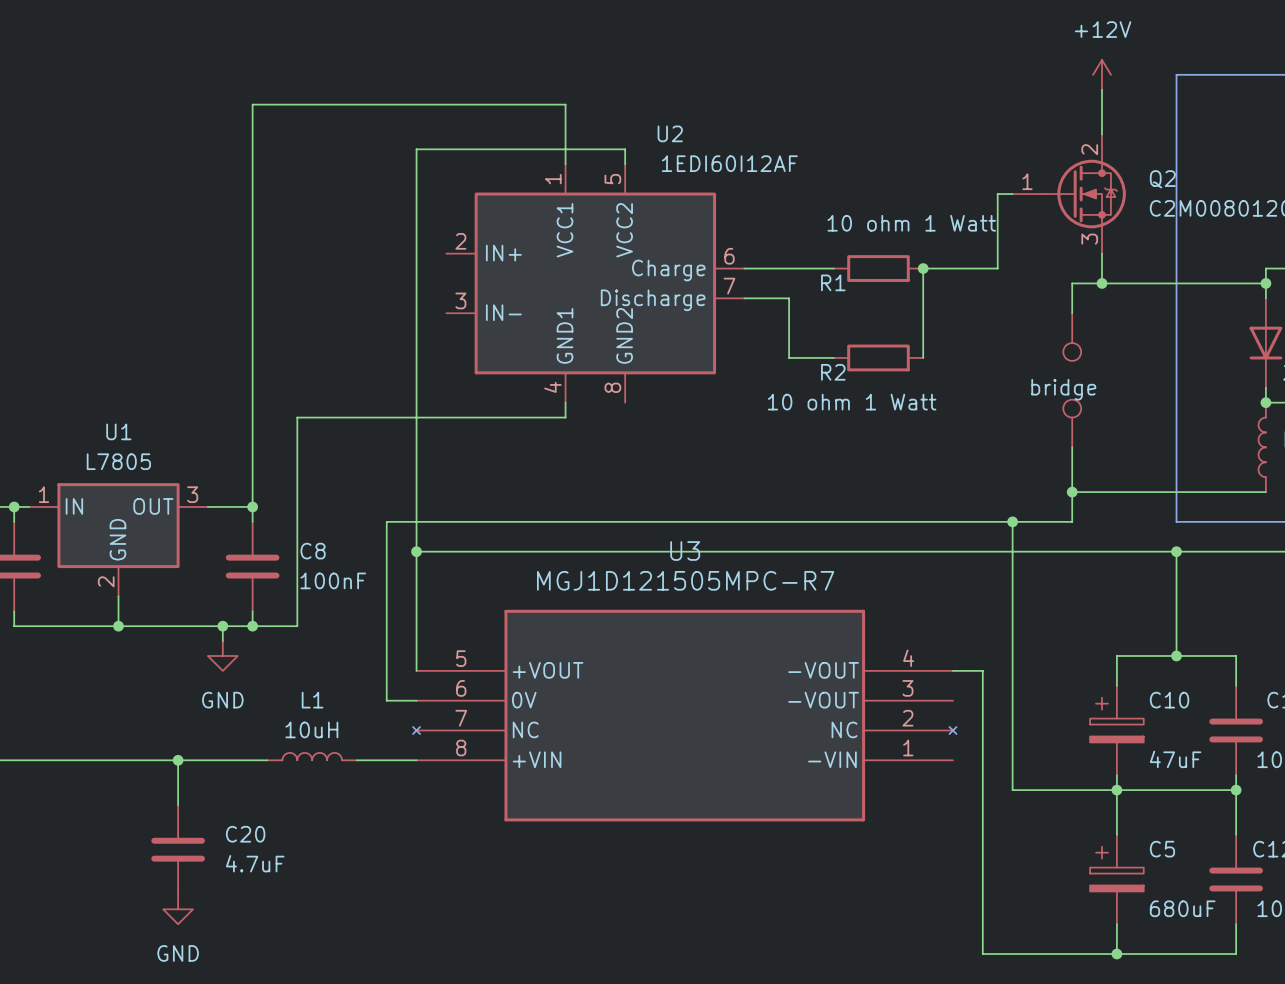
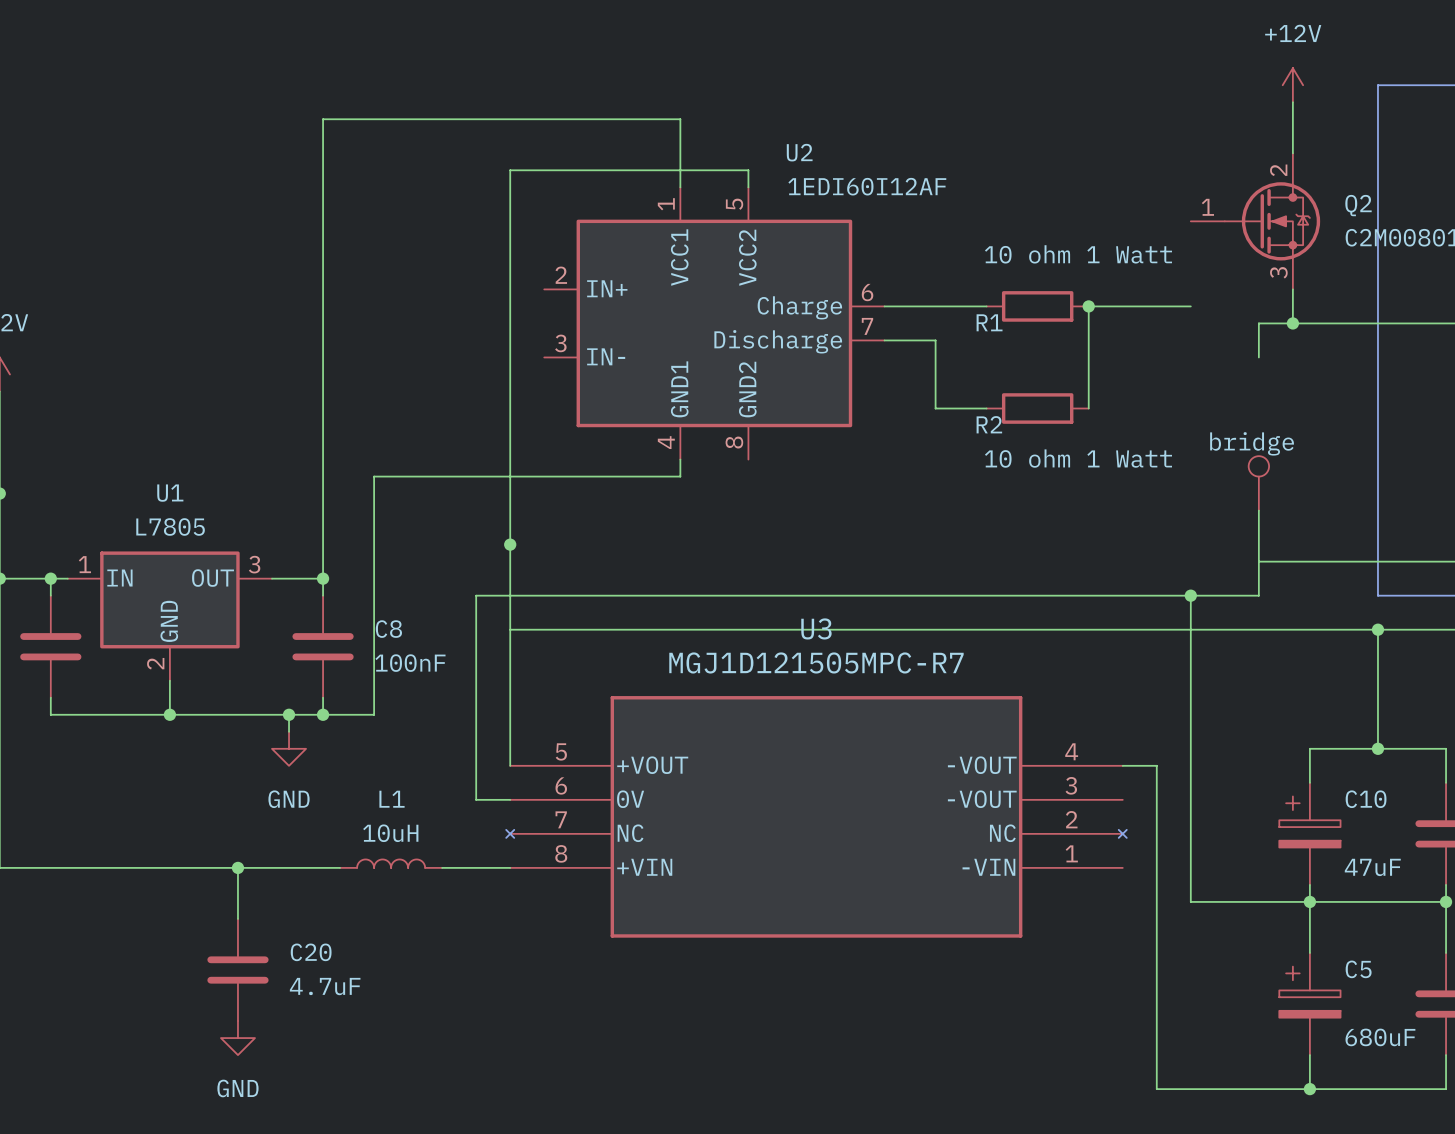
wire: (1012, 194) (997, 194) (997, 268) -> (1190, 306) (1173, 306)
part: (1072, 337) -> none
R2 value position: 10 ohm 1 Watt (852, 402) -> 10 ohm 1 Watt (1078, 458)
junction: none -> (510, 544)
junction: (1072, 492) -> none
junction: (416, 551) -> none

